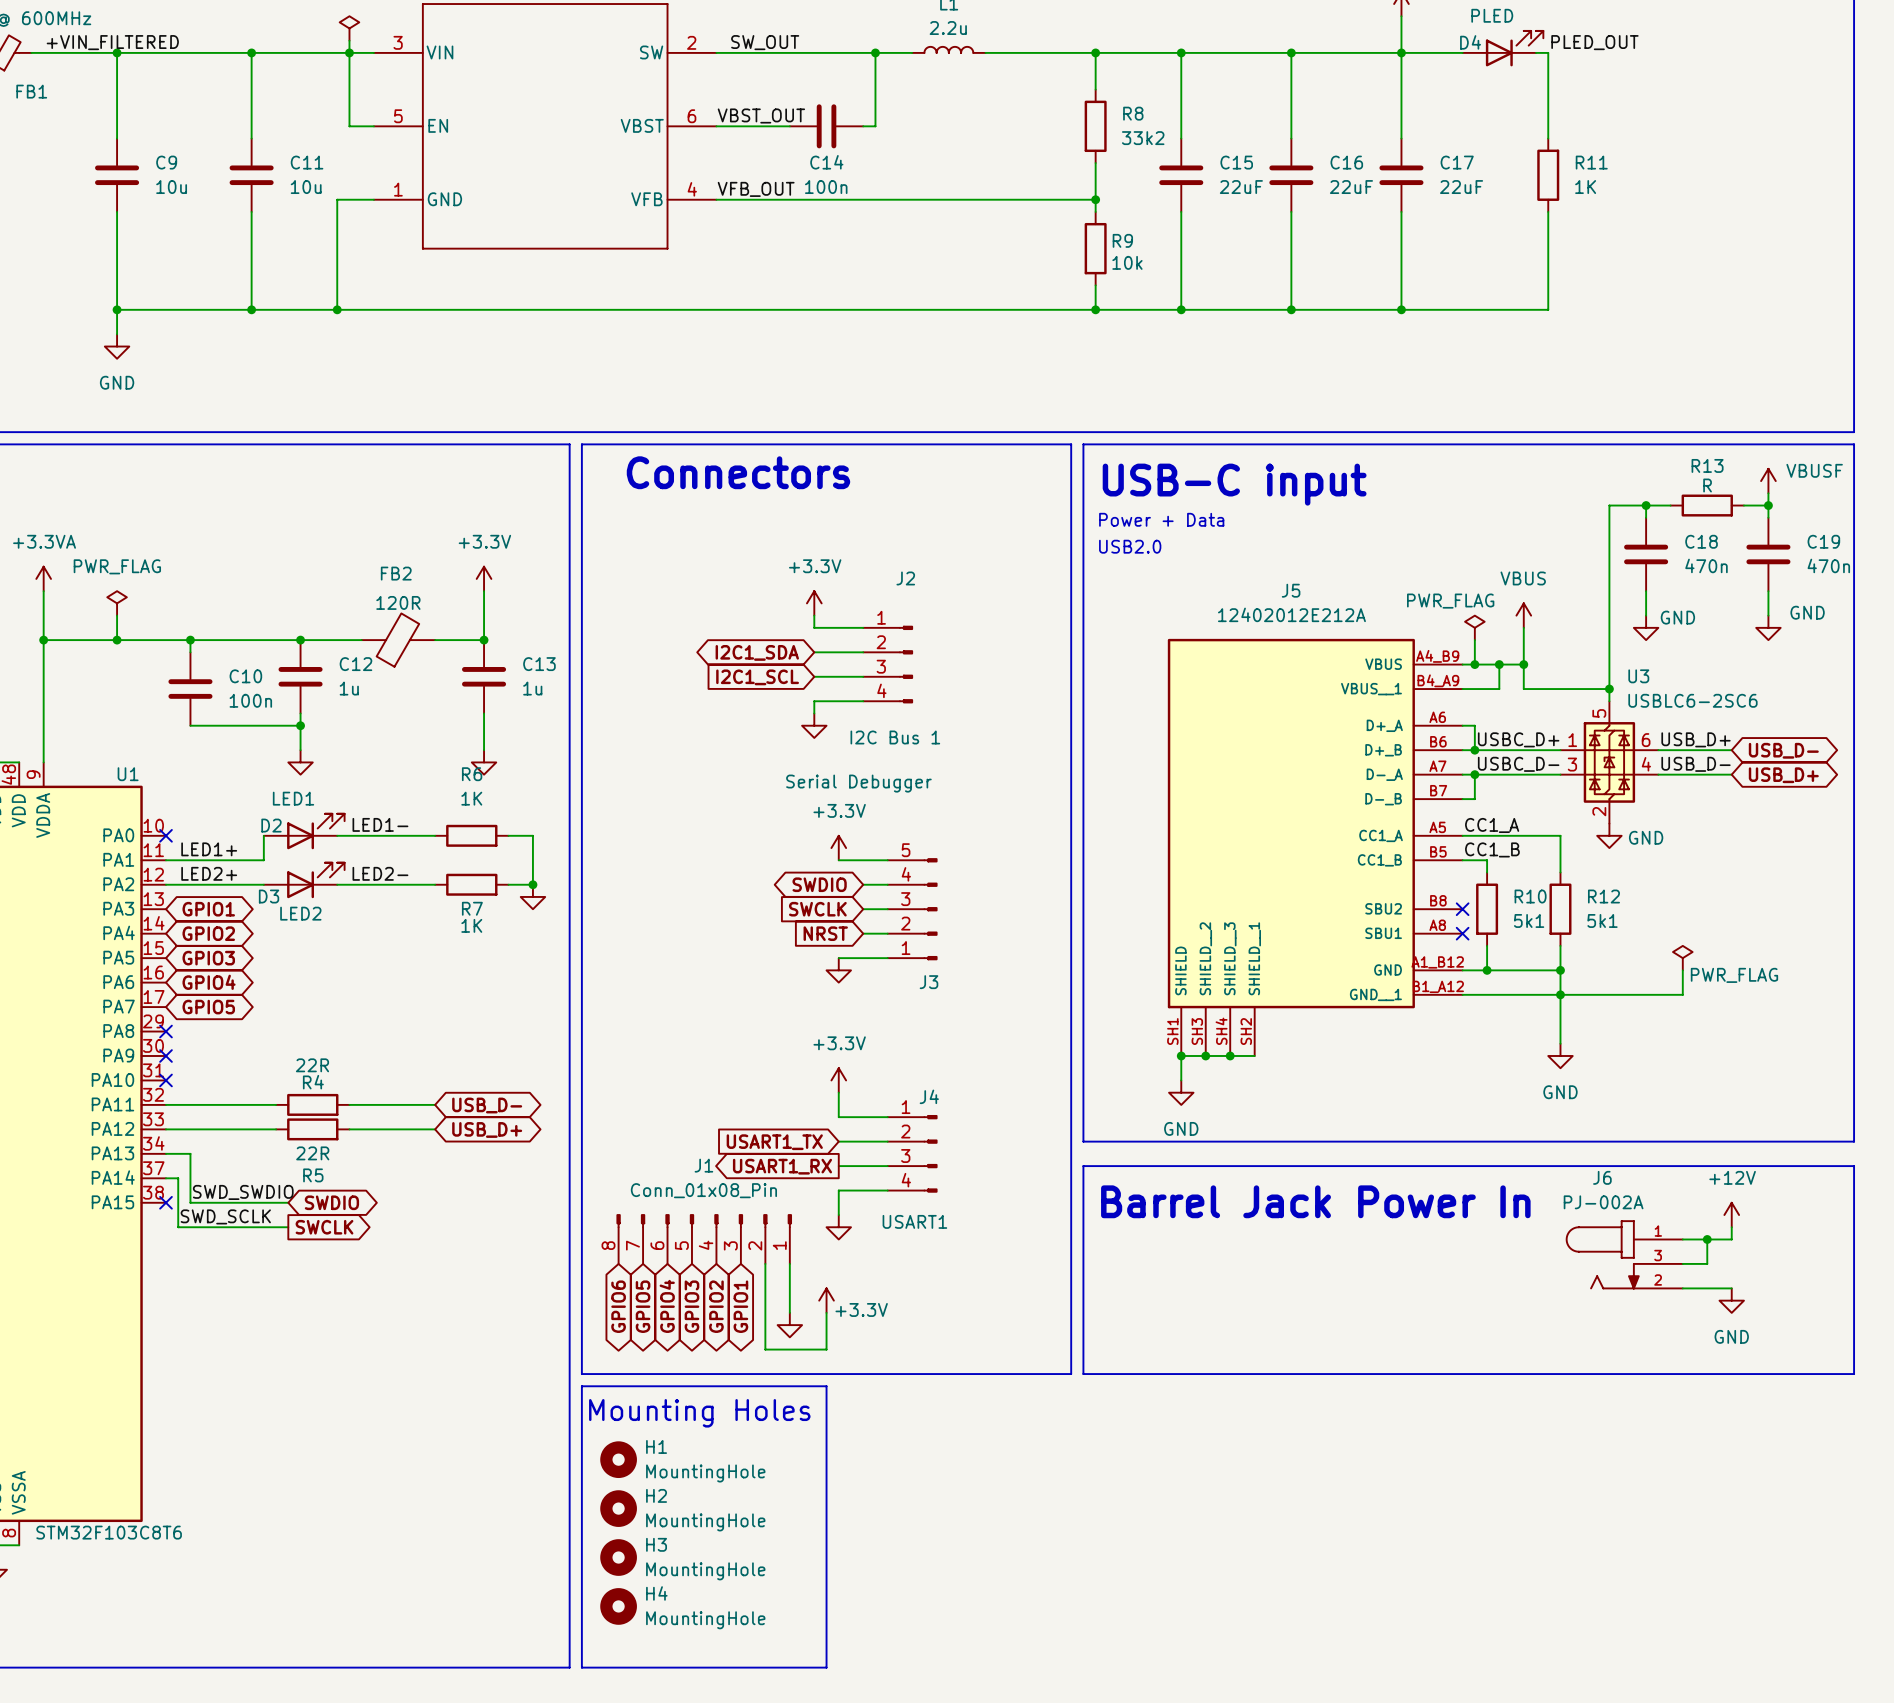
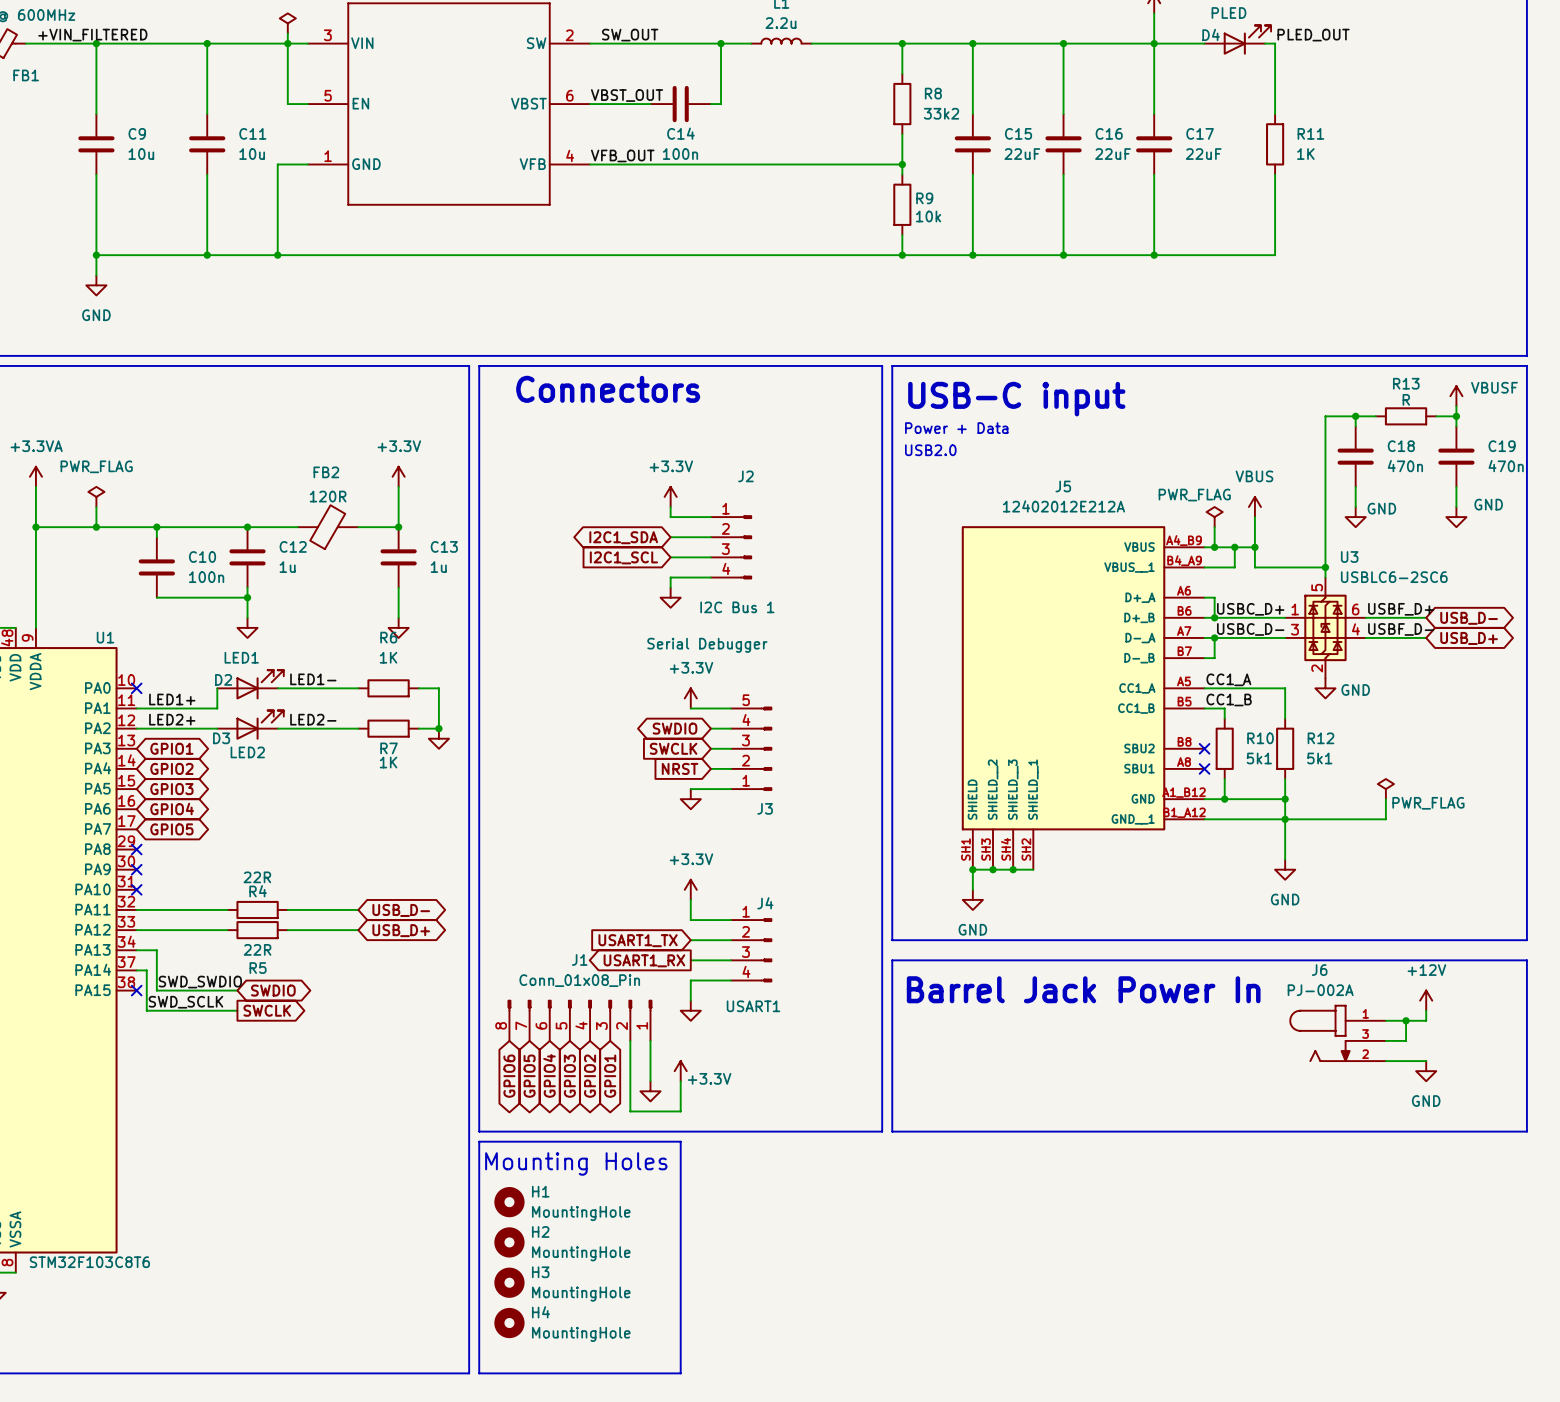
label: USB_D+ (1696, 739) -> USBF_D+ (1401, 609)
label: USB_D- (1696, 764) -> USBF_D- (1401, 629)

